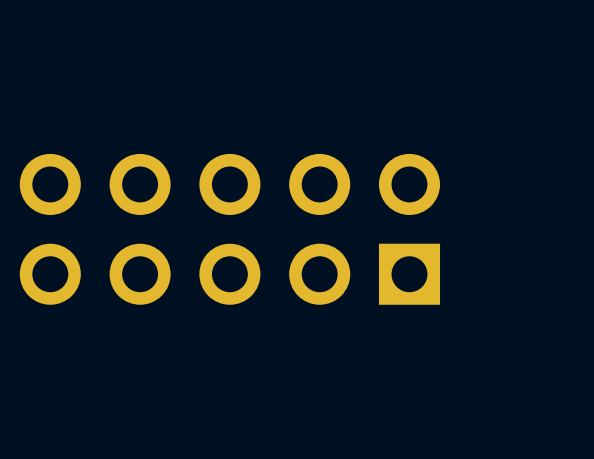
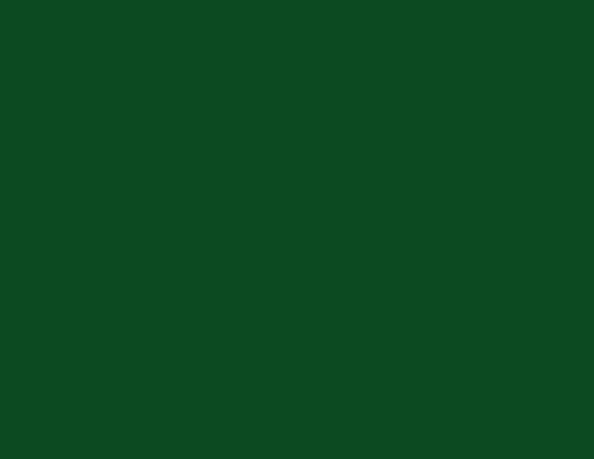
part: (229, 229) -> none

